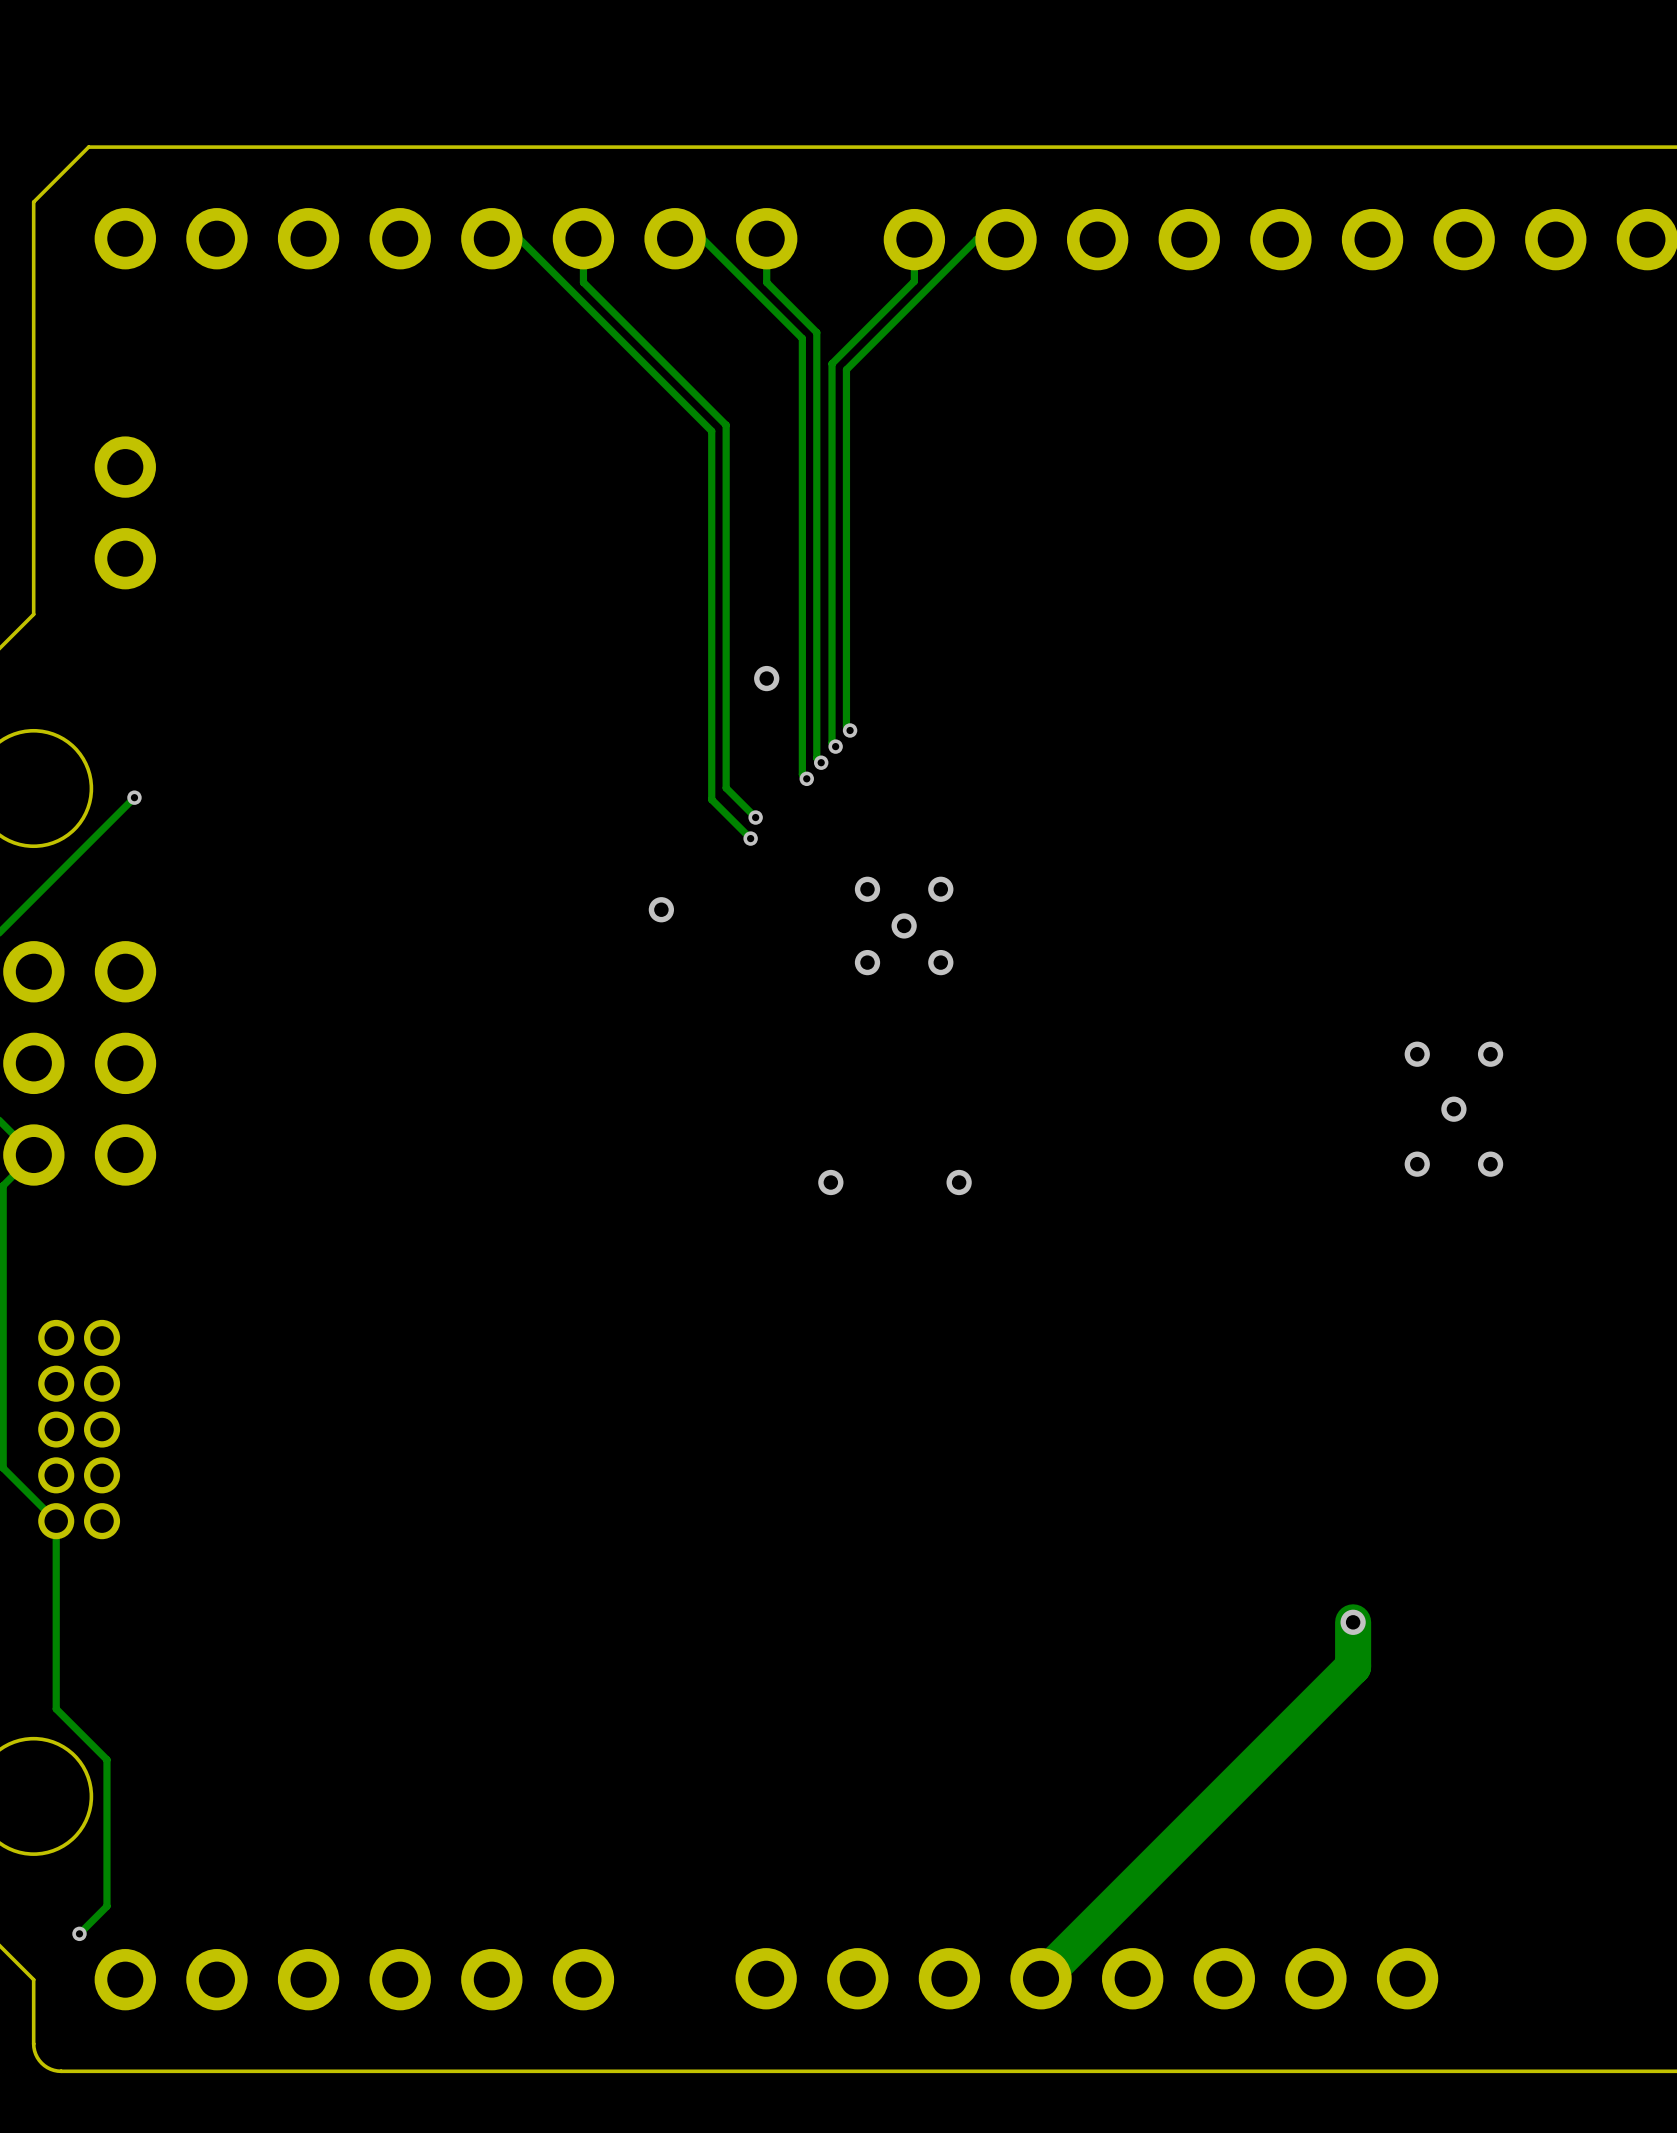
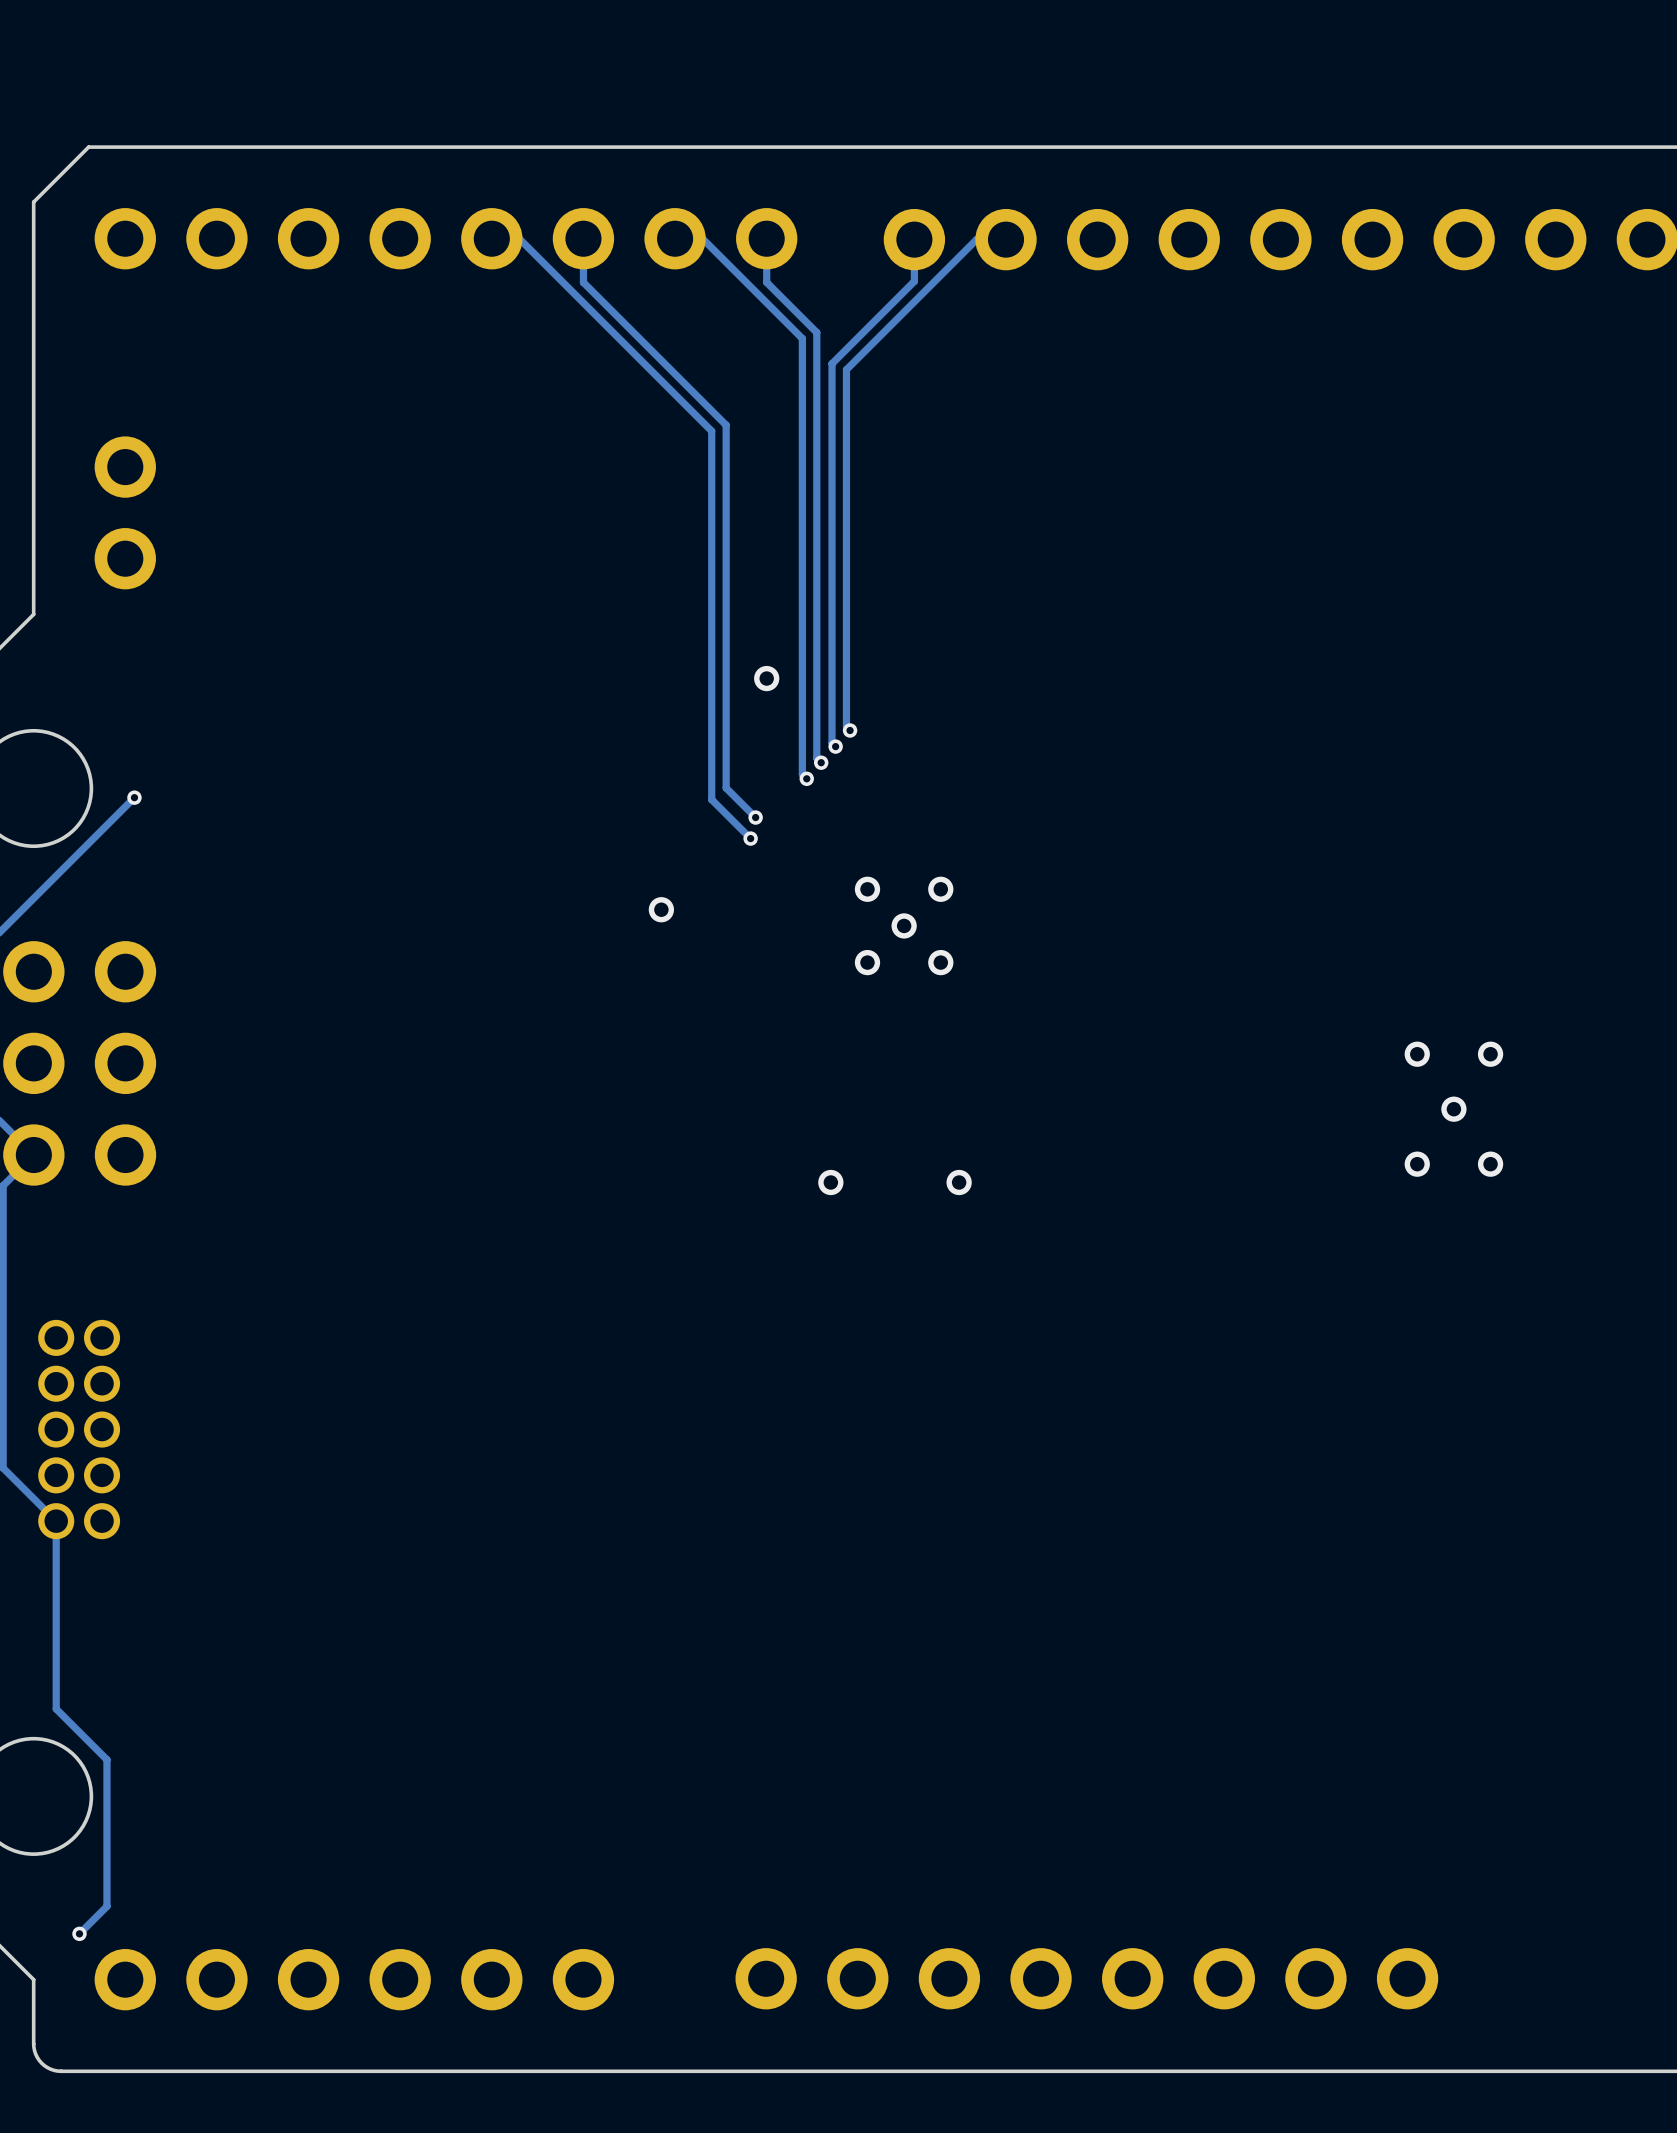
track: (1353, 1622) (1353, 1666) (1041, 1978) -> none
via: (1353, 1622) -> none

